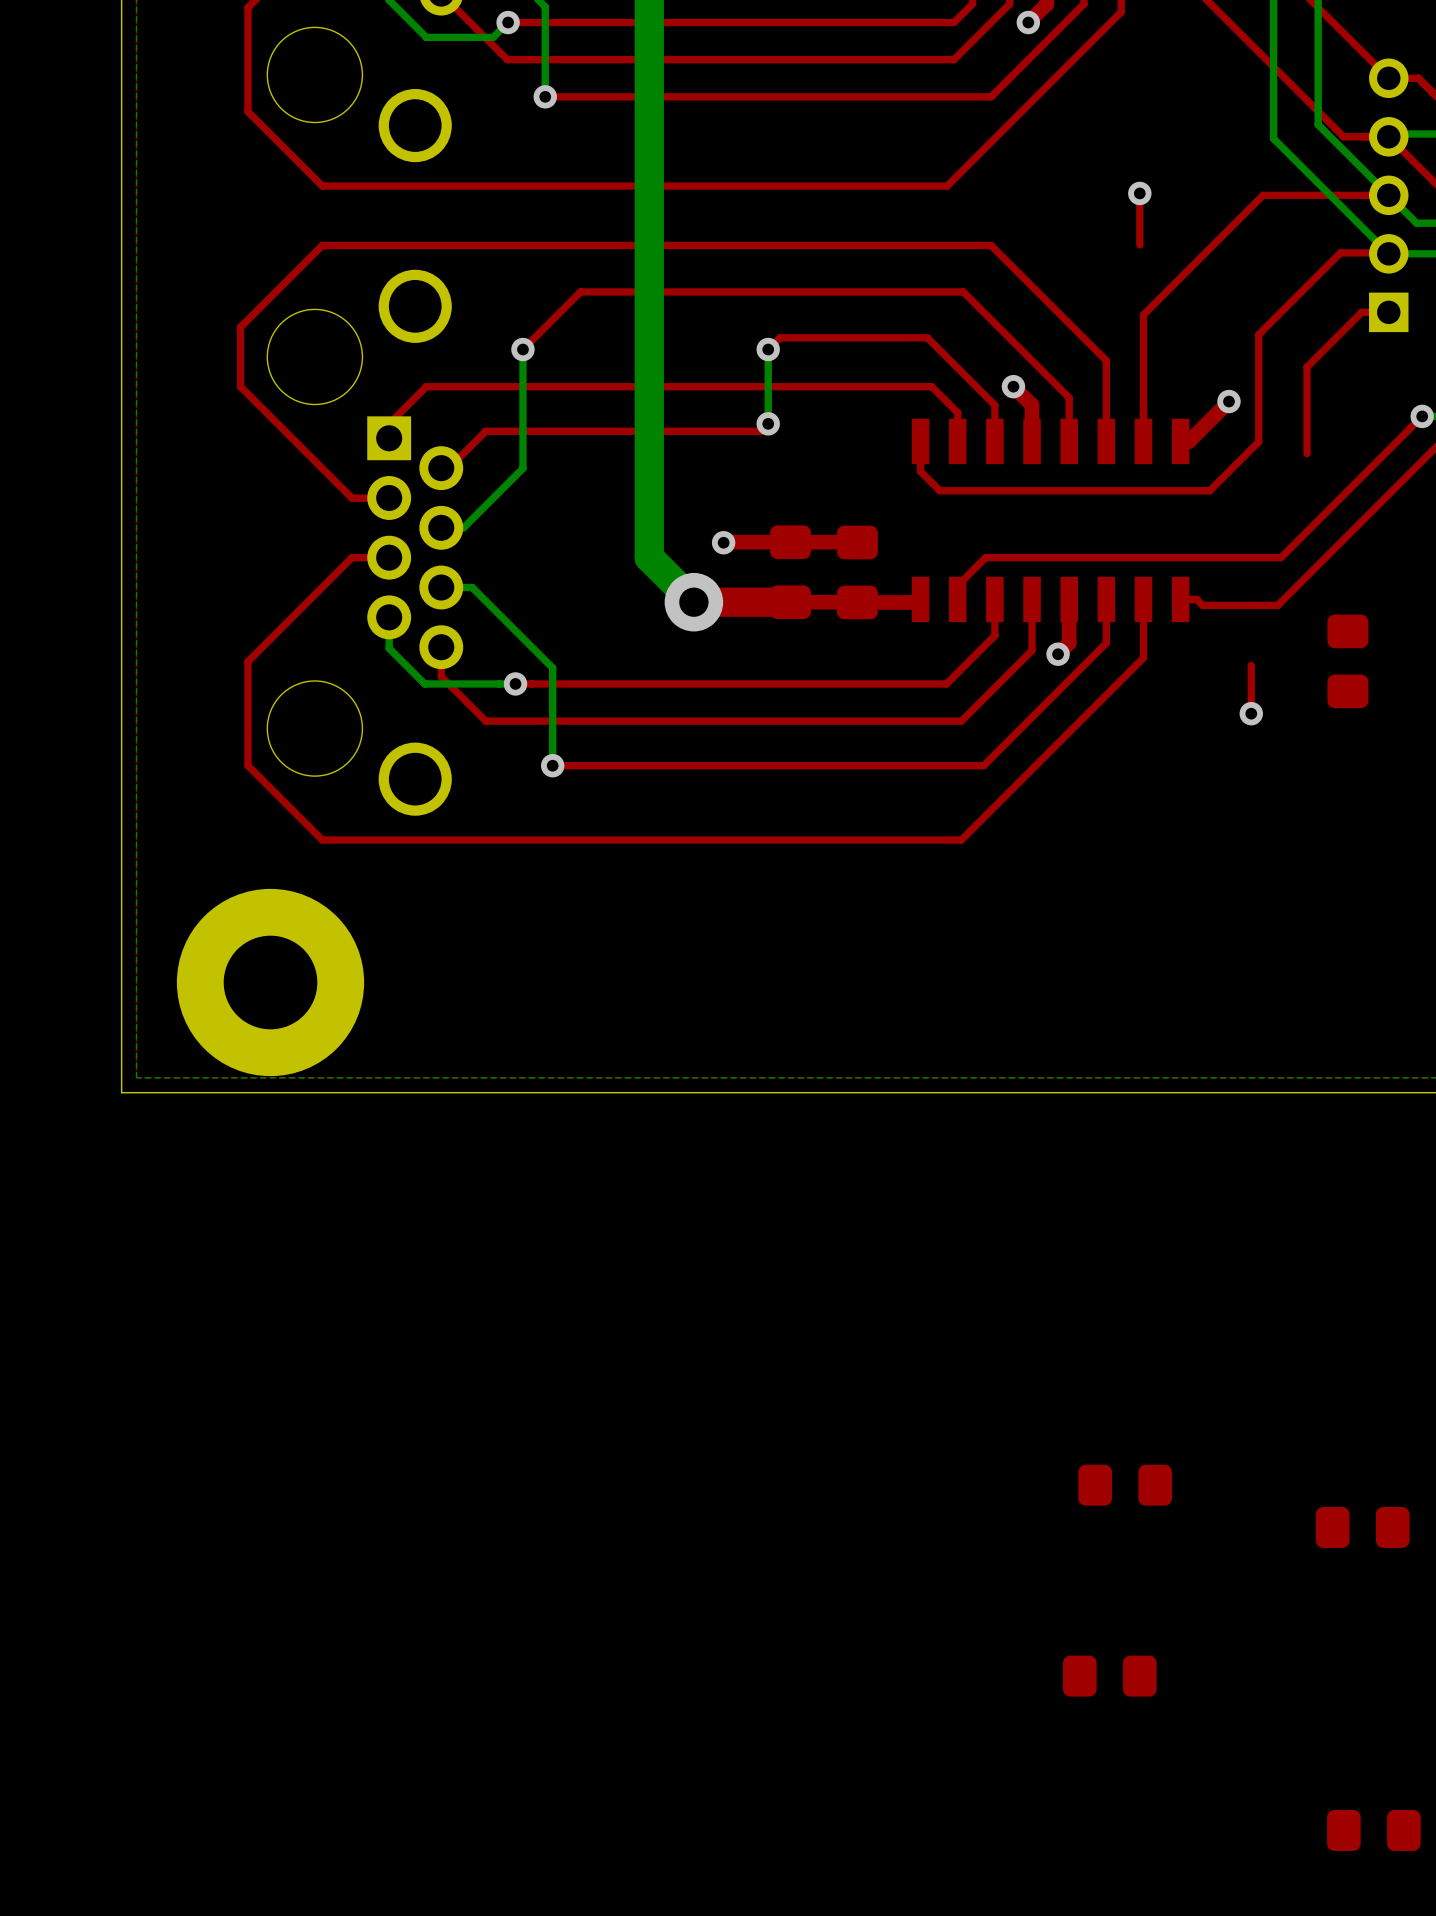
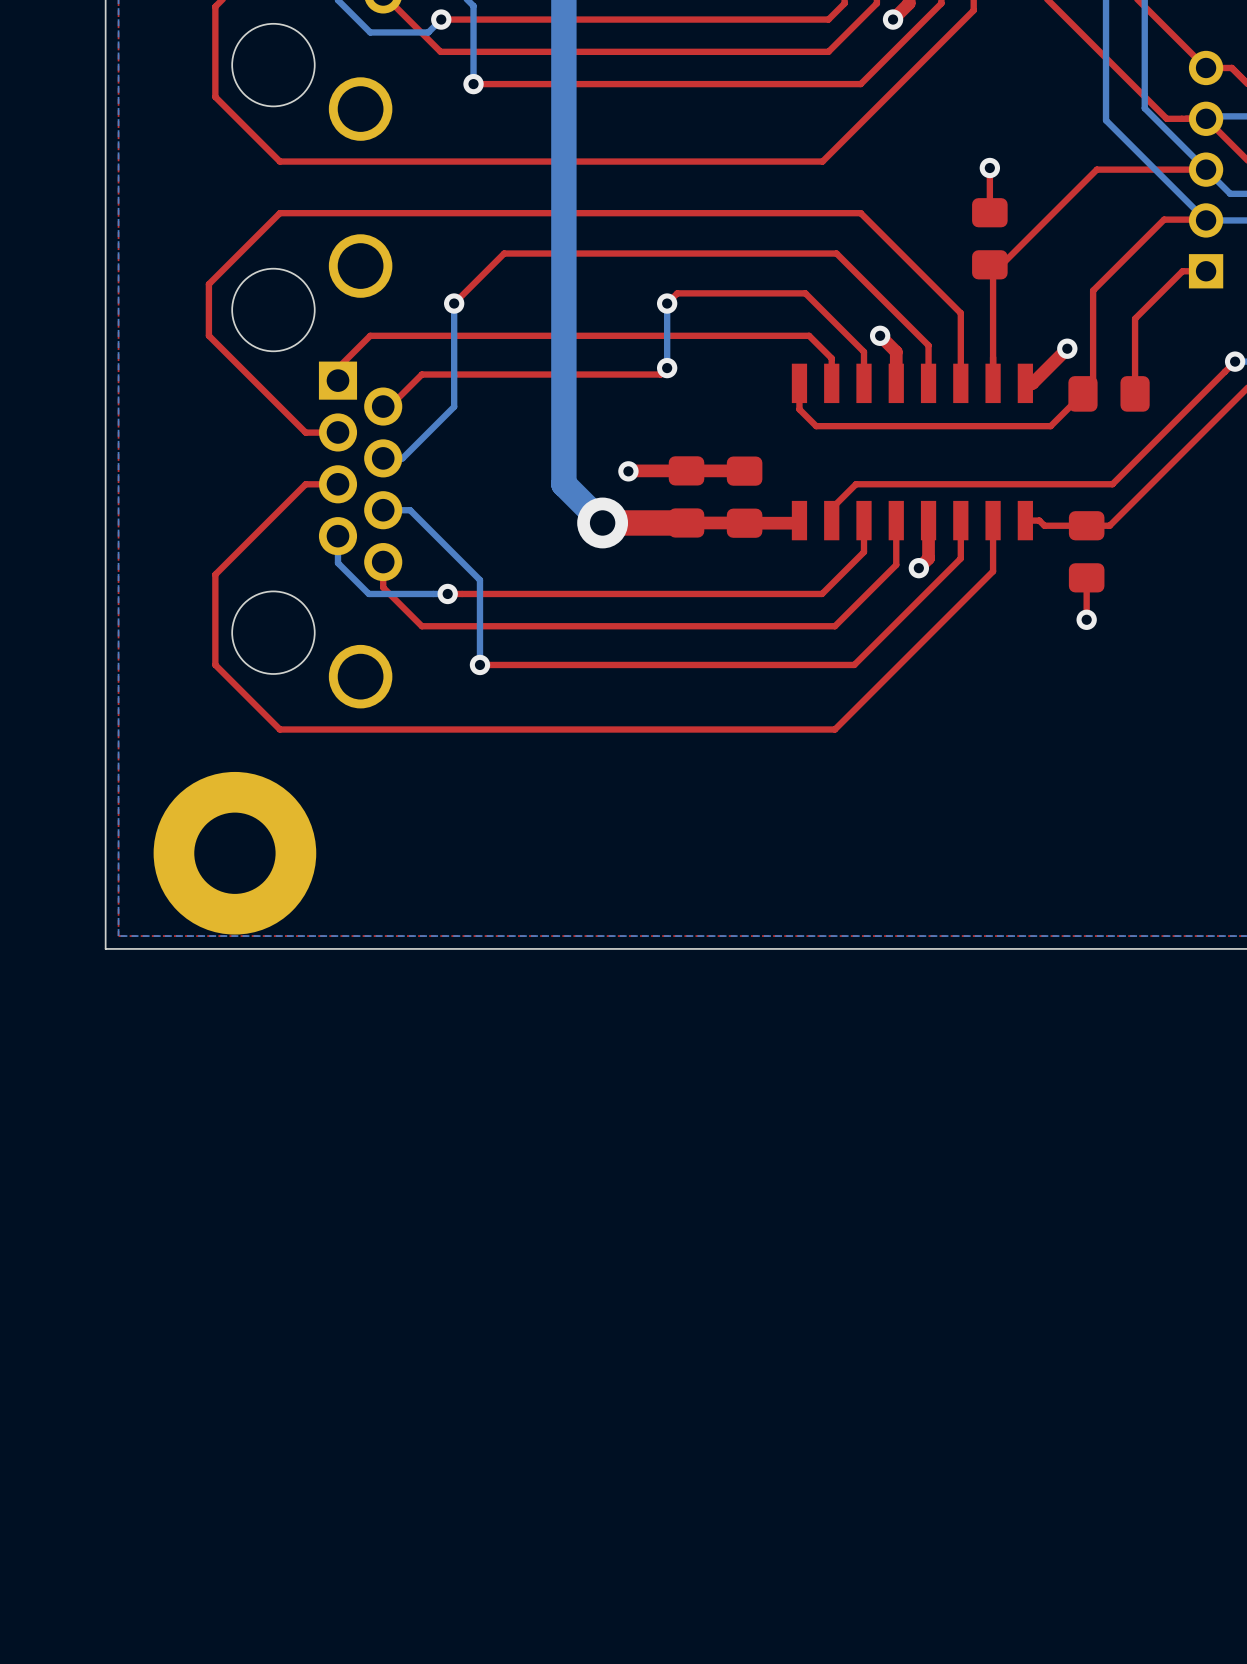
part: none -> (989, 238)
part: none -> (1109, 393)
part position: (1347, 661) -> (1086, 551)
part: (1125, 1485) -> none
part: (1362, 1527) -> none
part: (1109, 1676) -> none
part: (1373, 1830) -> none

